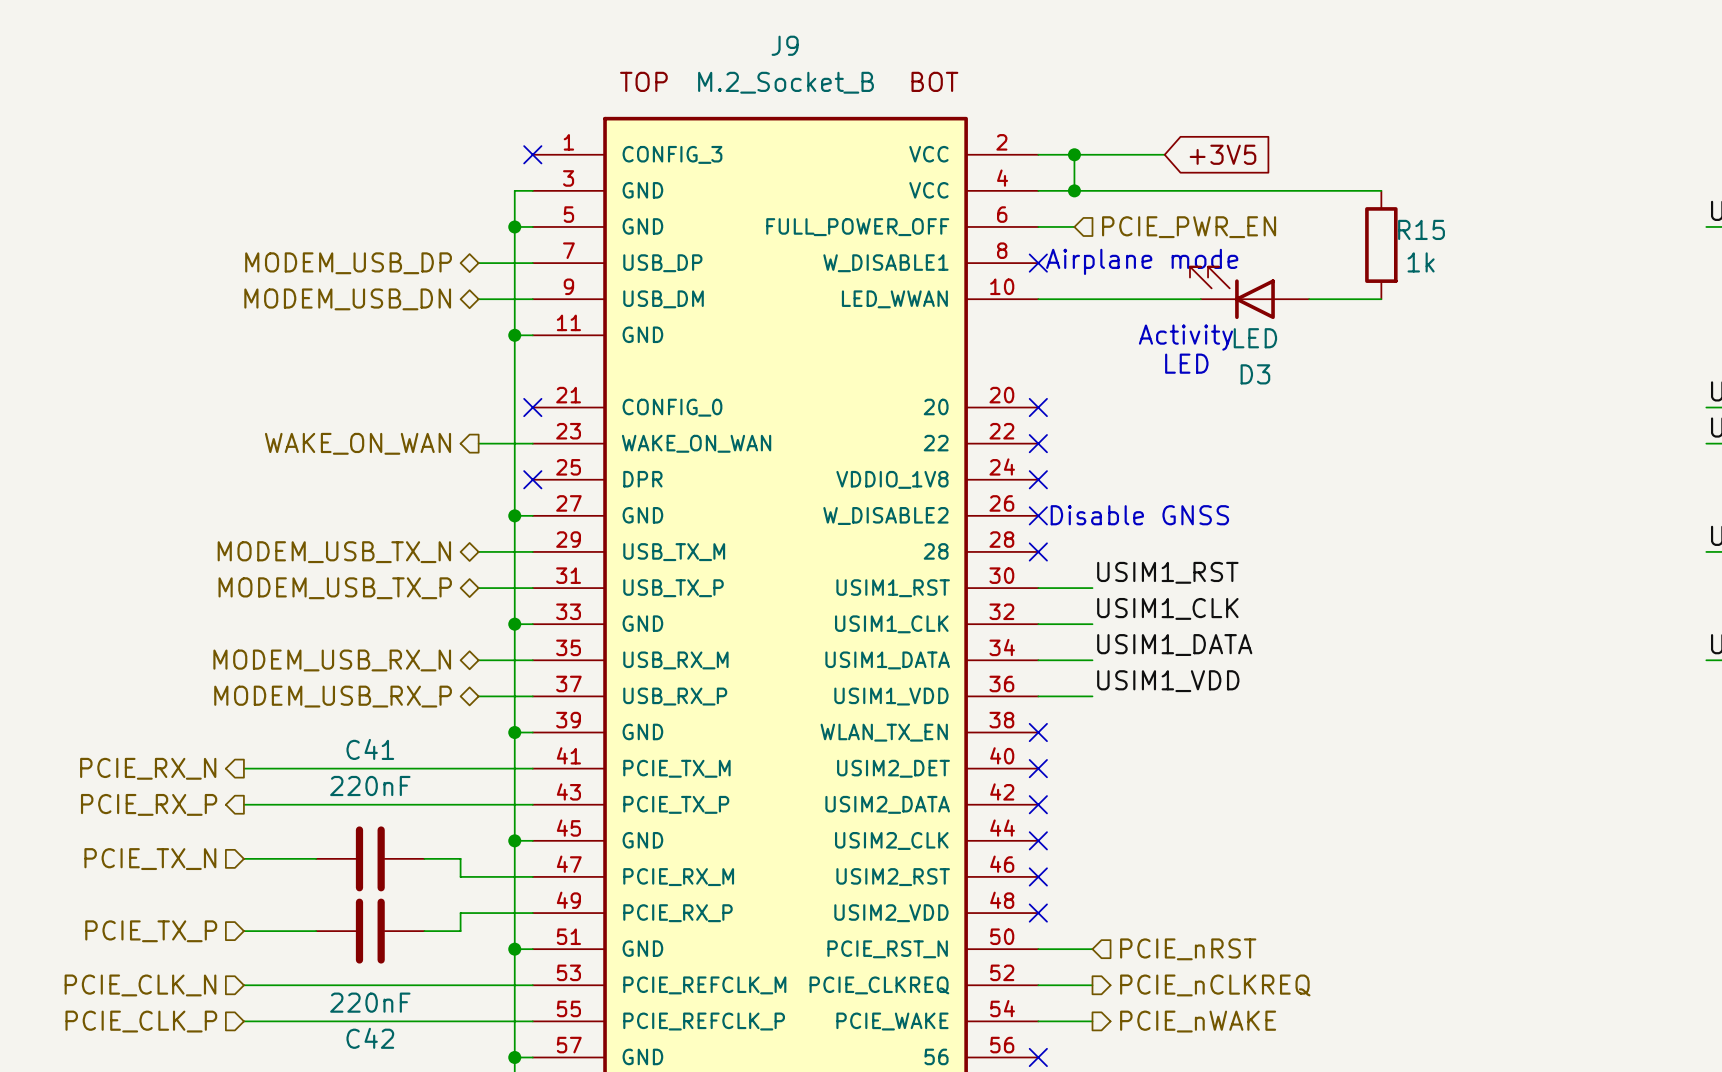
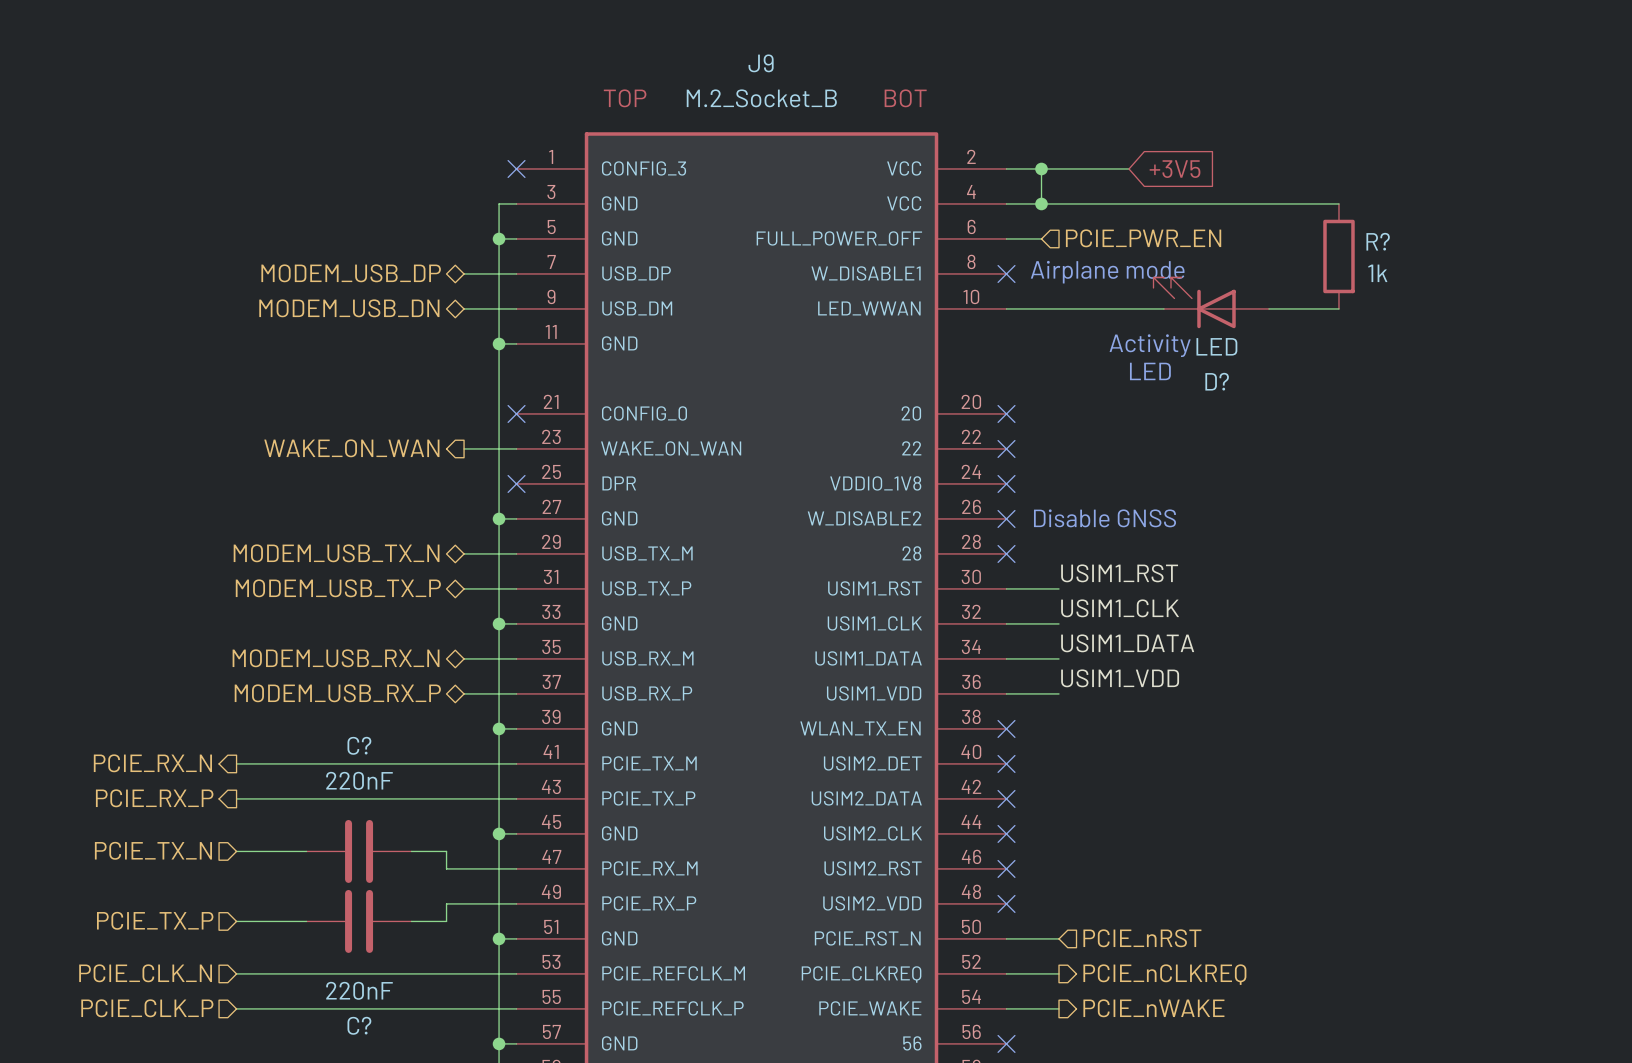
R15 name: R15 (1421, 229) -> R? (1378, 241)
D3 name: D3 (1255, 374) -> D? (1217, 381)
C41 name: C41 (370, 749) -> C? (359, 745)
C42 name: C42 (370, 1038) -> C? (359, 1025)

